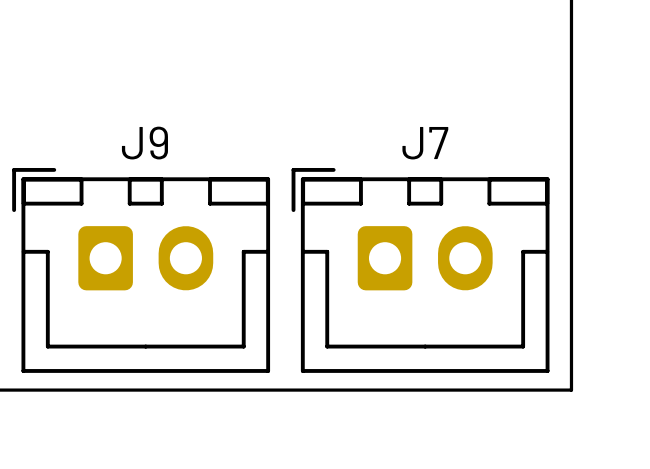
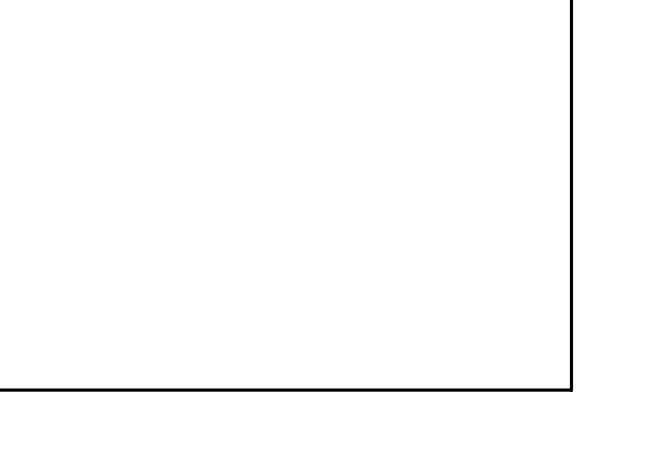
J9: (141, 270) -> none
J7: (420, 270) -> none

